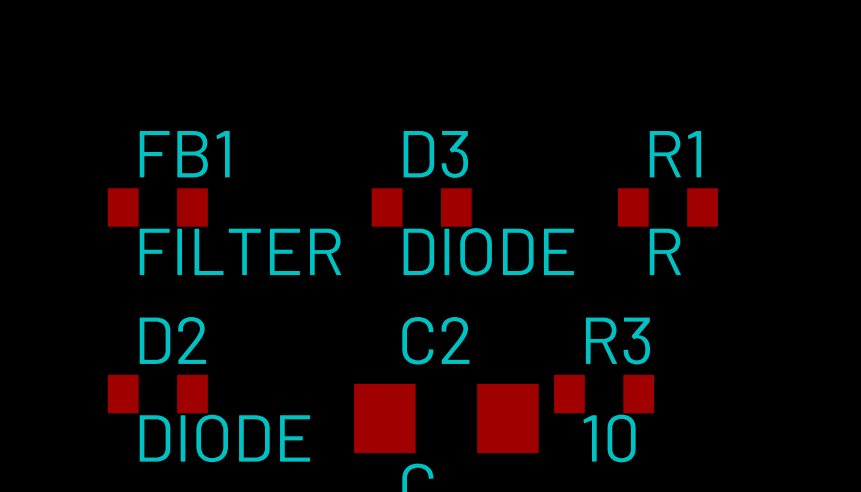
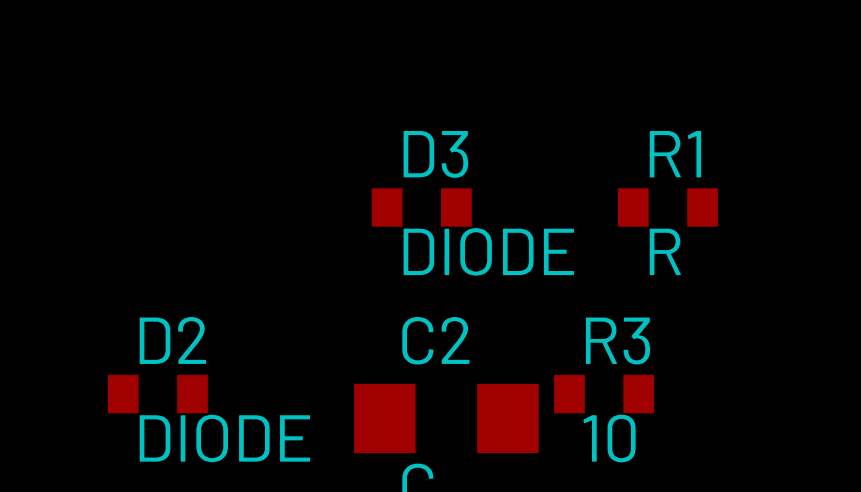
FB1: FILTER (157, 207) -> none

